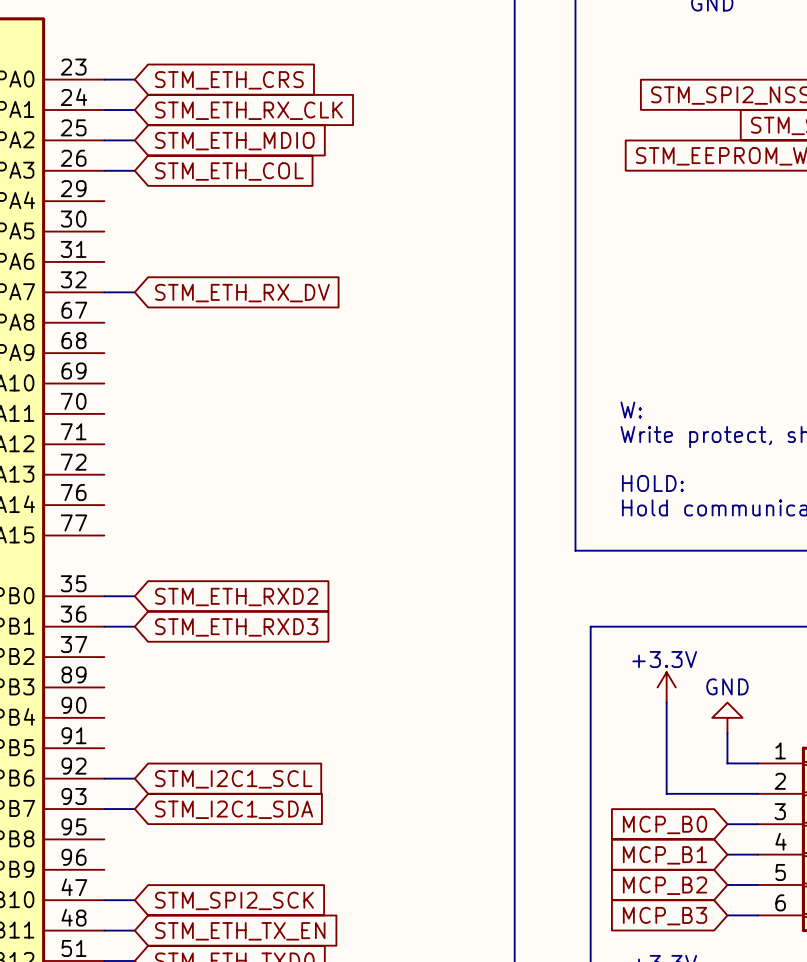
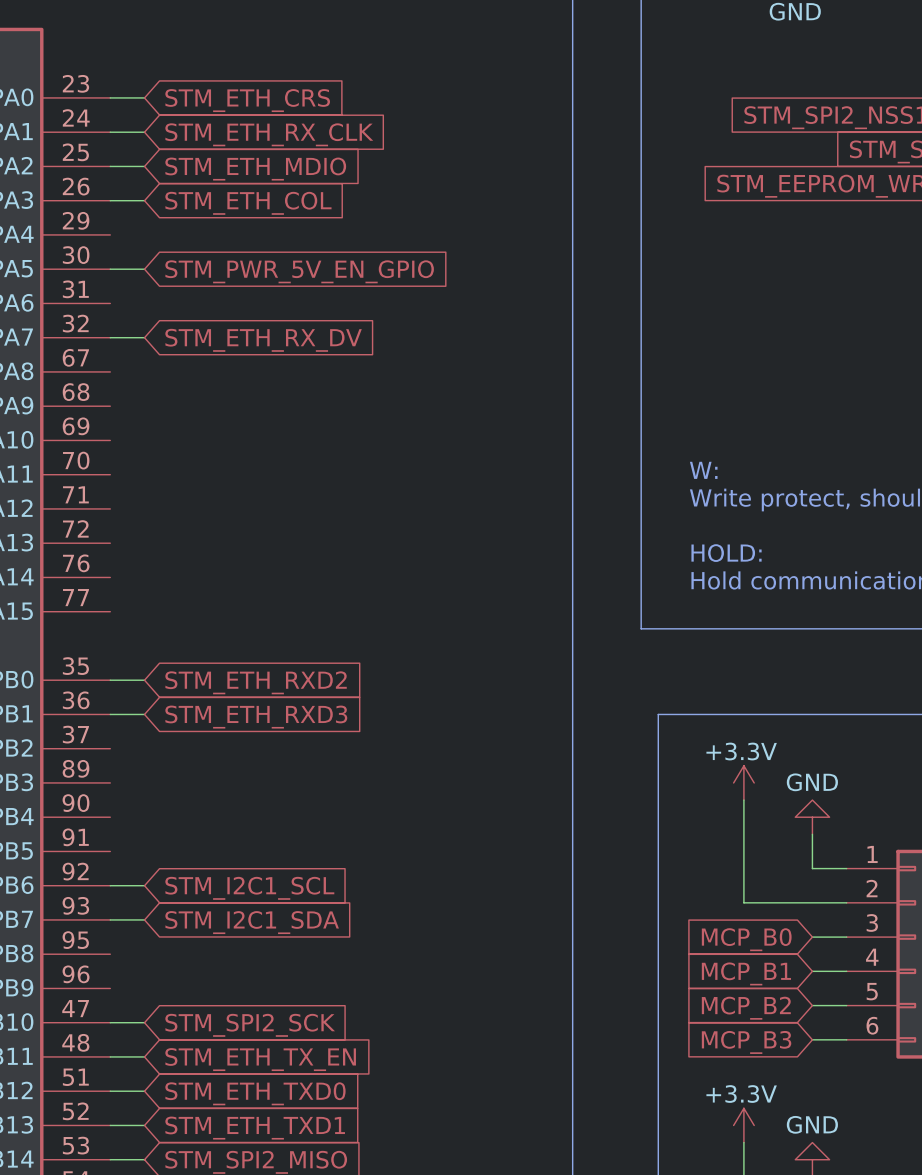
wire: none -> (110, 269) (144, 269)
global label: none -> STM_PWR_5V_EN_GPIO (299, 271)

